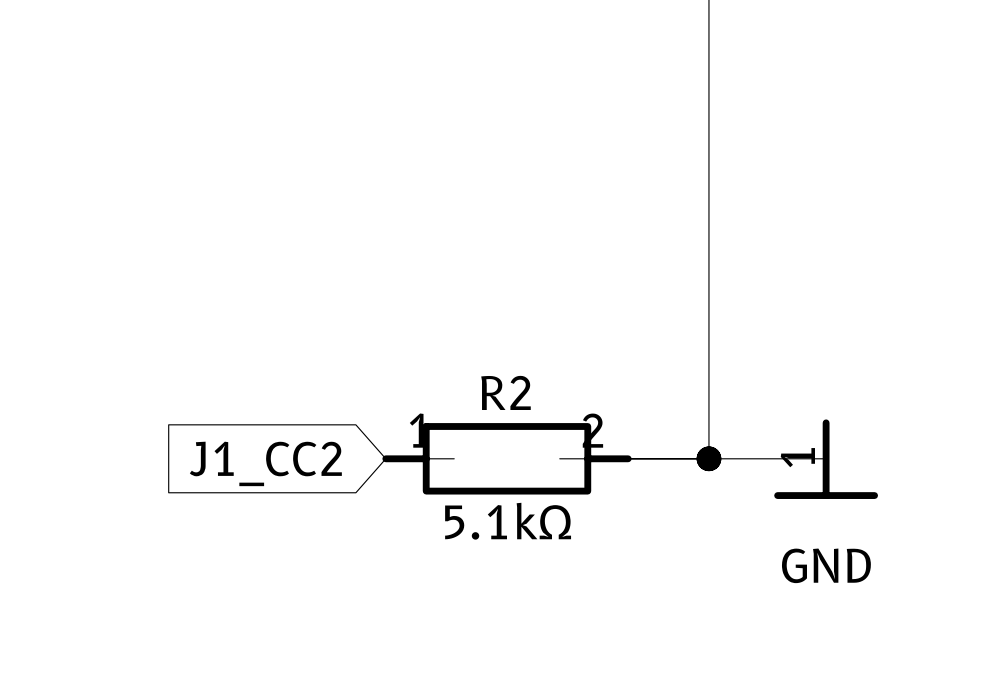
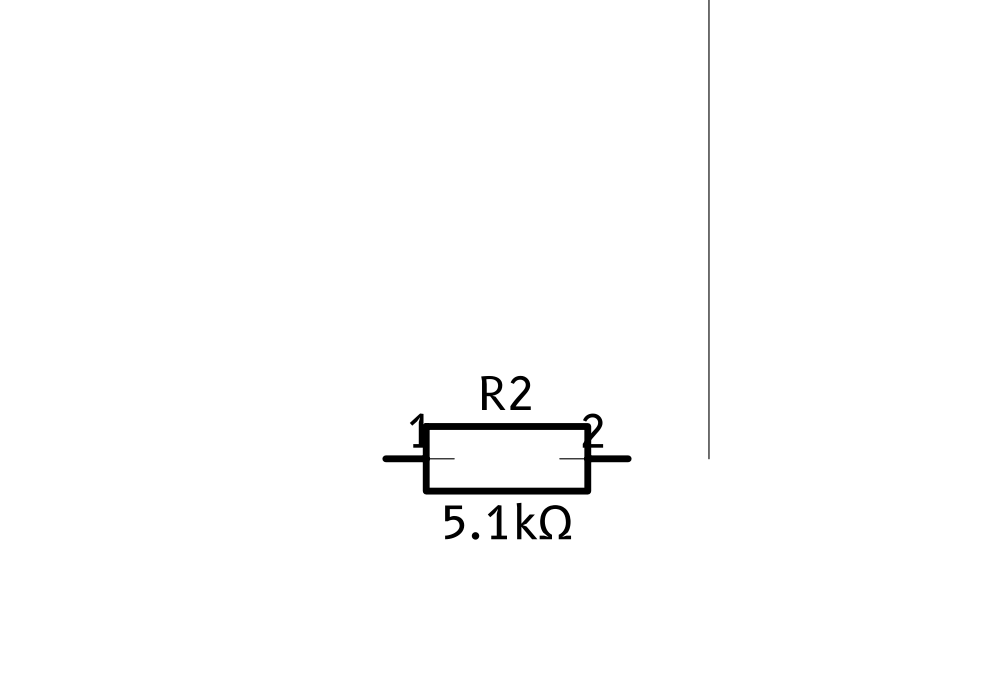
wire: (628, 458) (826, 458) -> none
junction: (708, 458) -> none
GND: (826, 459) -> none
global label: J1_CC2 (265, 463) -> none

